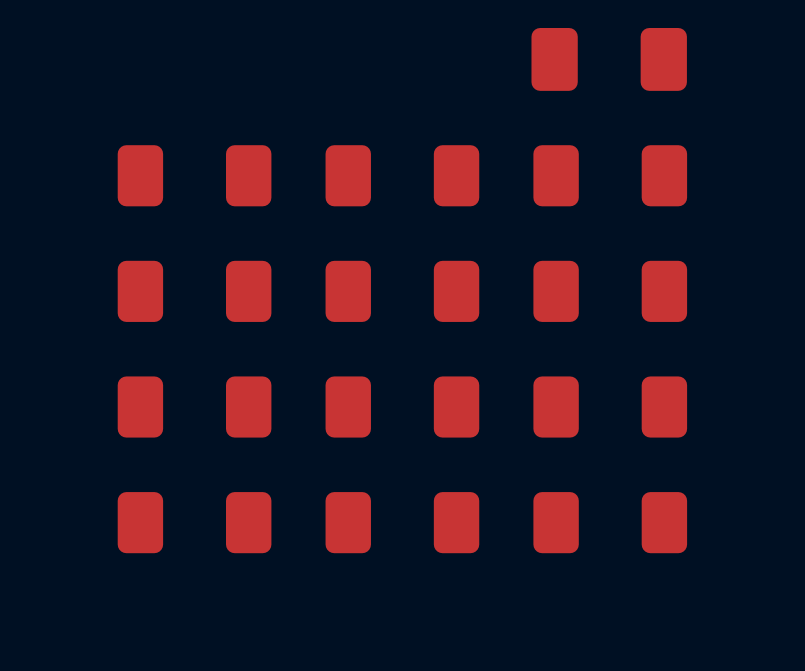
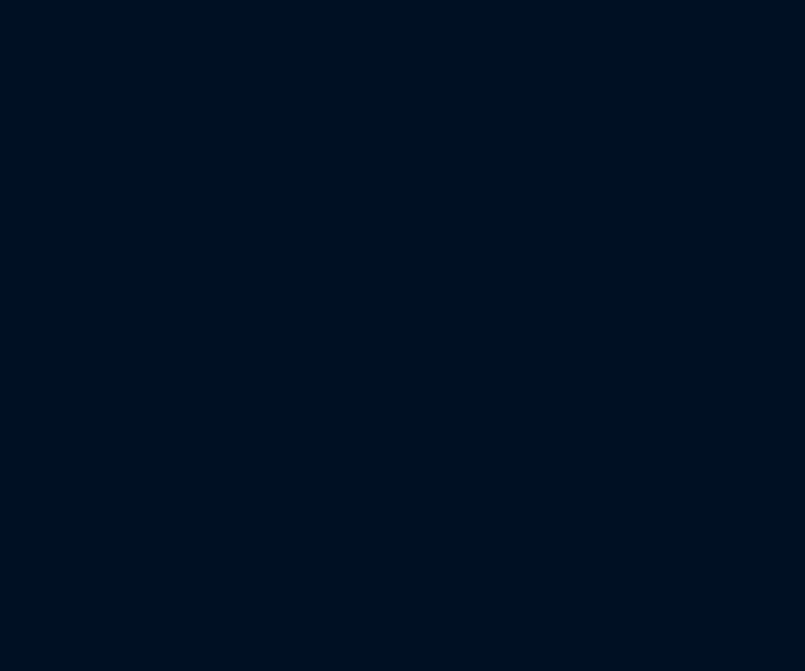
part: (609, 59) -> none
part: (194, 175) -> none
part: (402, 175) -> none
part: (610, 175) -> none
part: (194, 291) -> none
part: (402, 291) -> none
part: (610, 291) -> none
part: (194, 407) -> none
part: (402, 407) -> none
part: (610, 407) -> none
part: (194, 522) -> none
part: (402, 522) -> none
part: (610, 522) -> none

